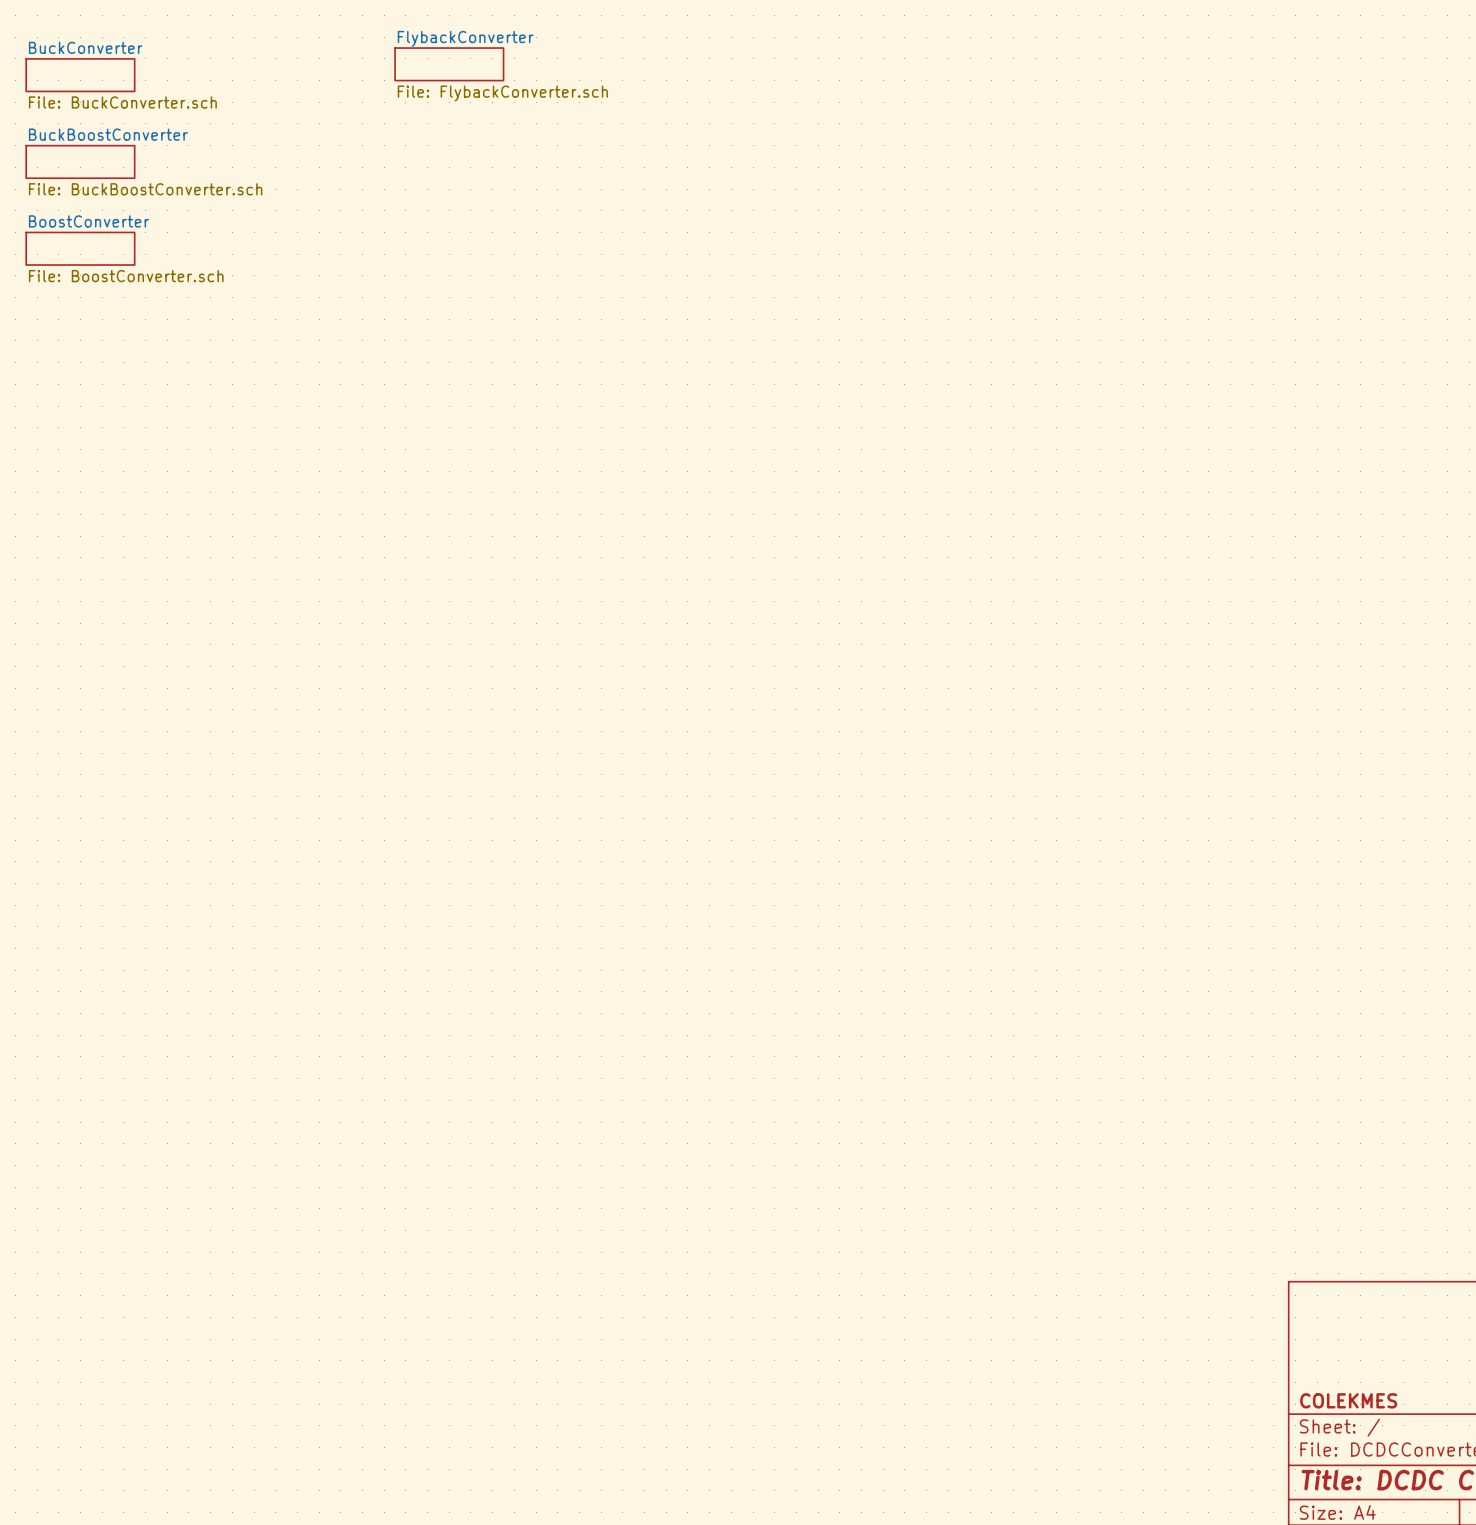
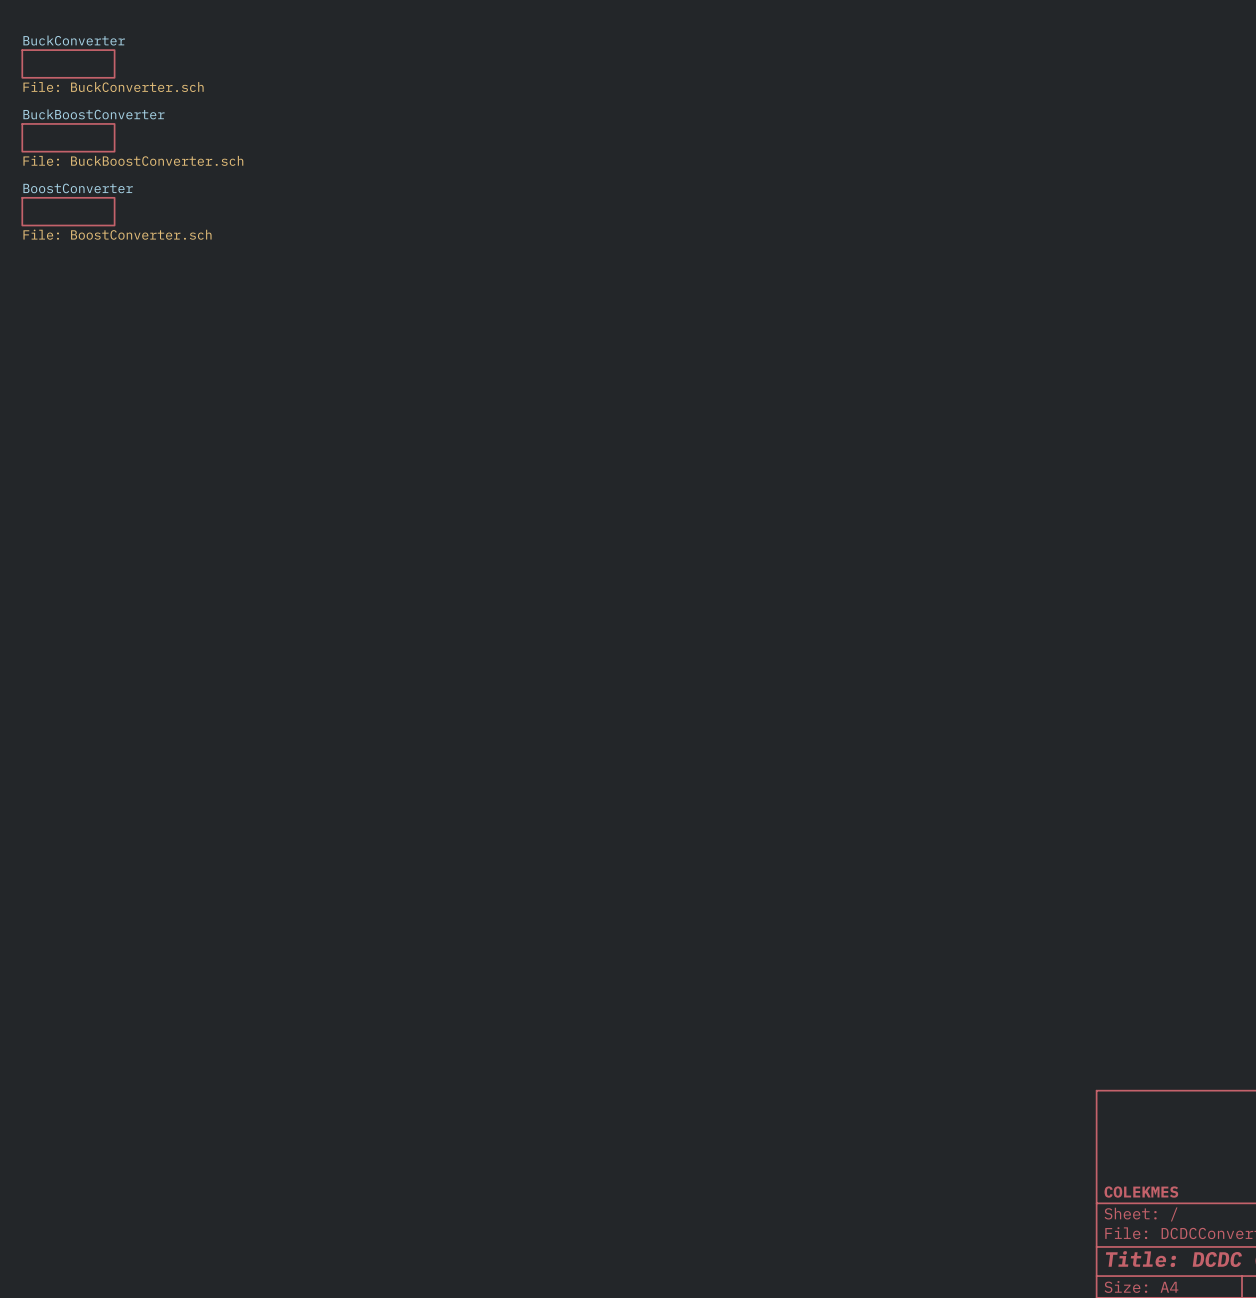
sheet FlybackConverter: File: FlybackConverter.sch (449, 64) -> none

